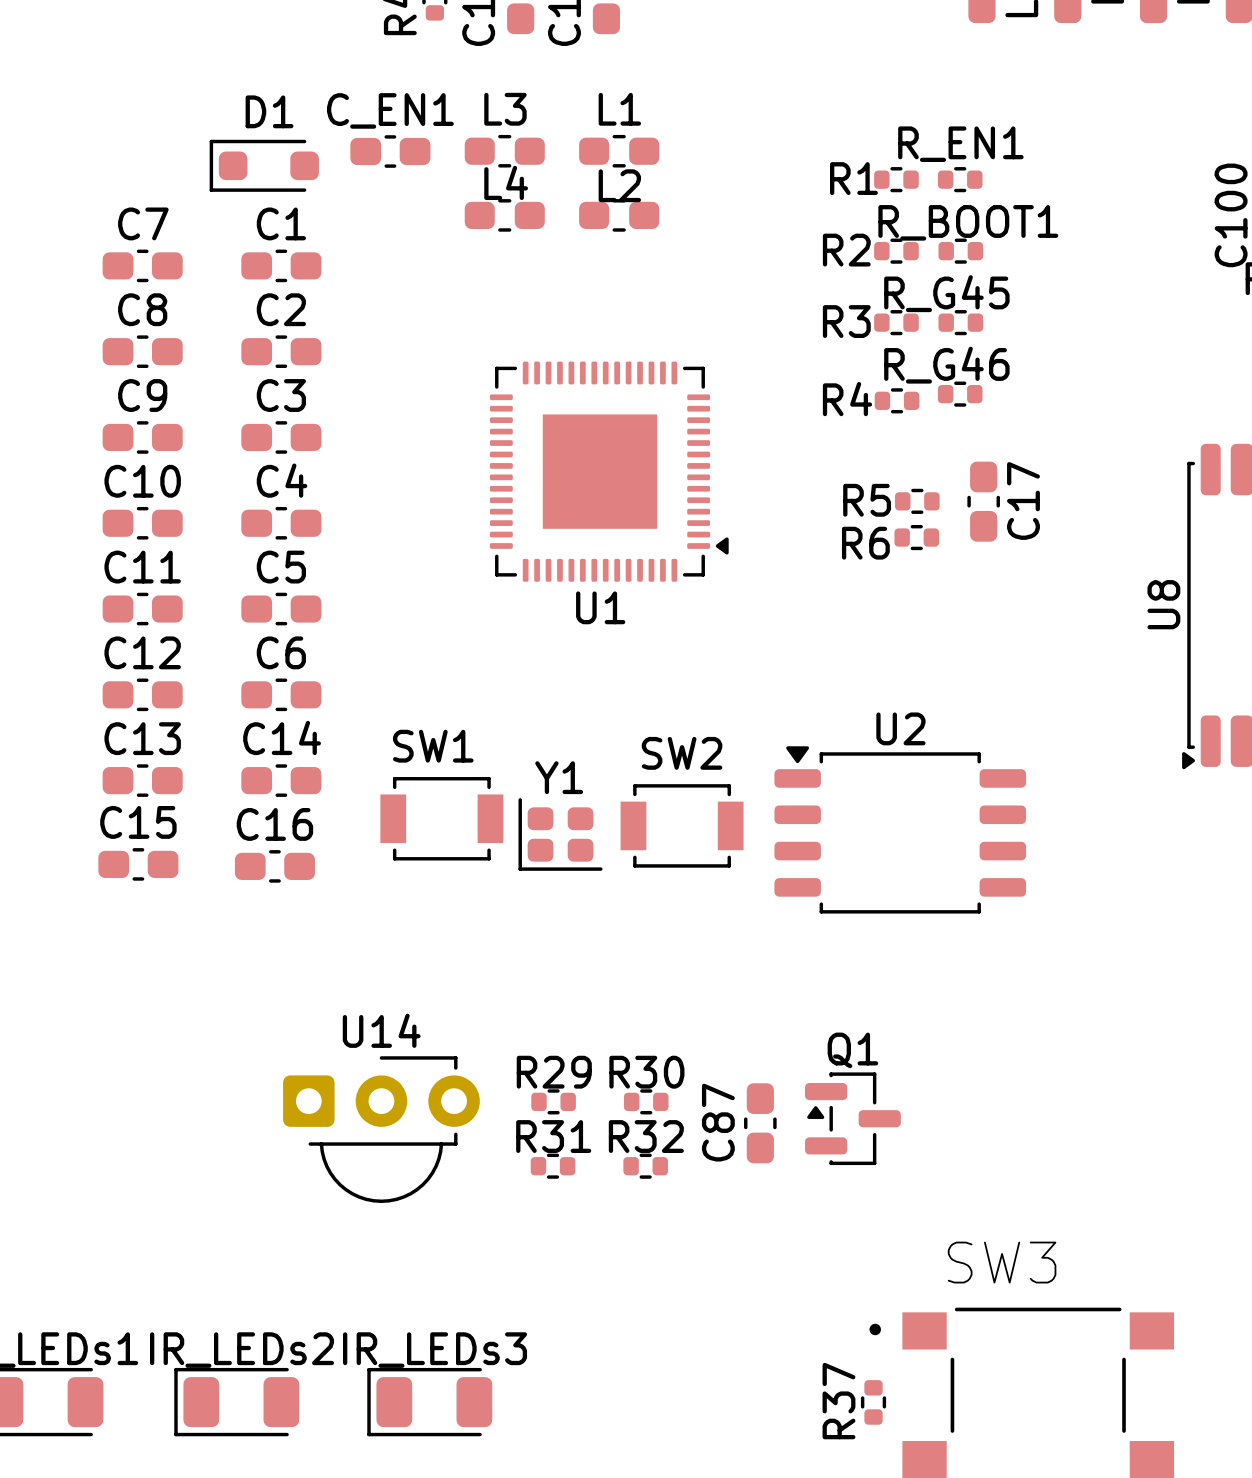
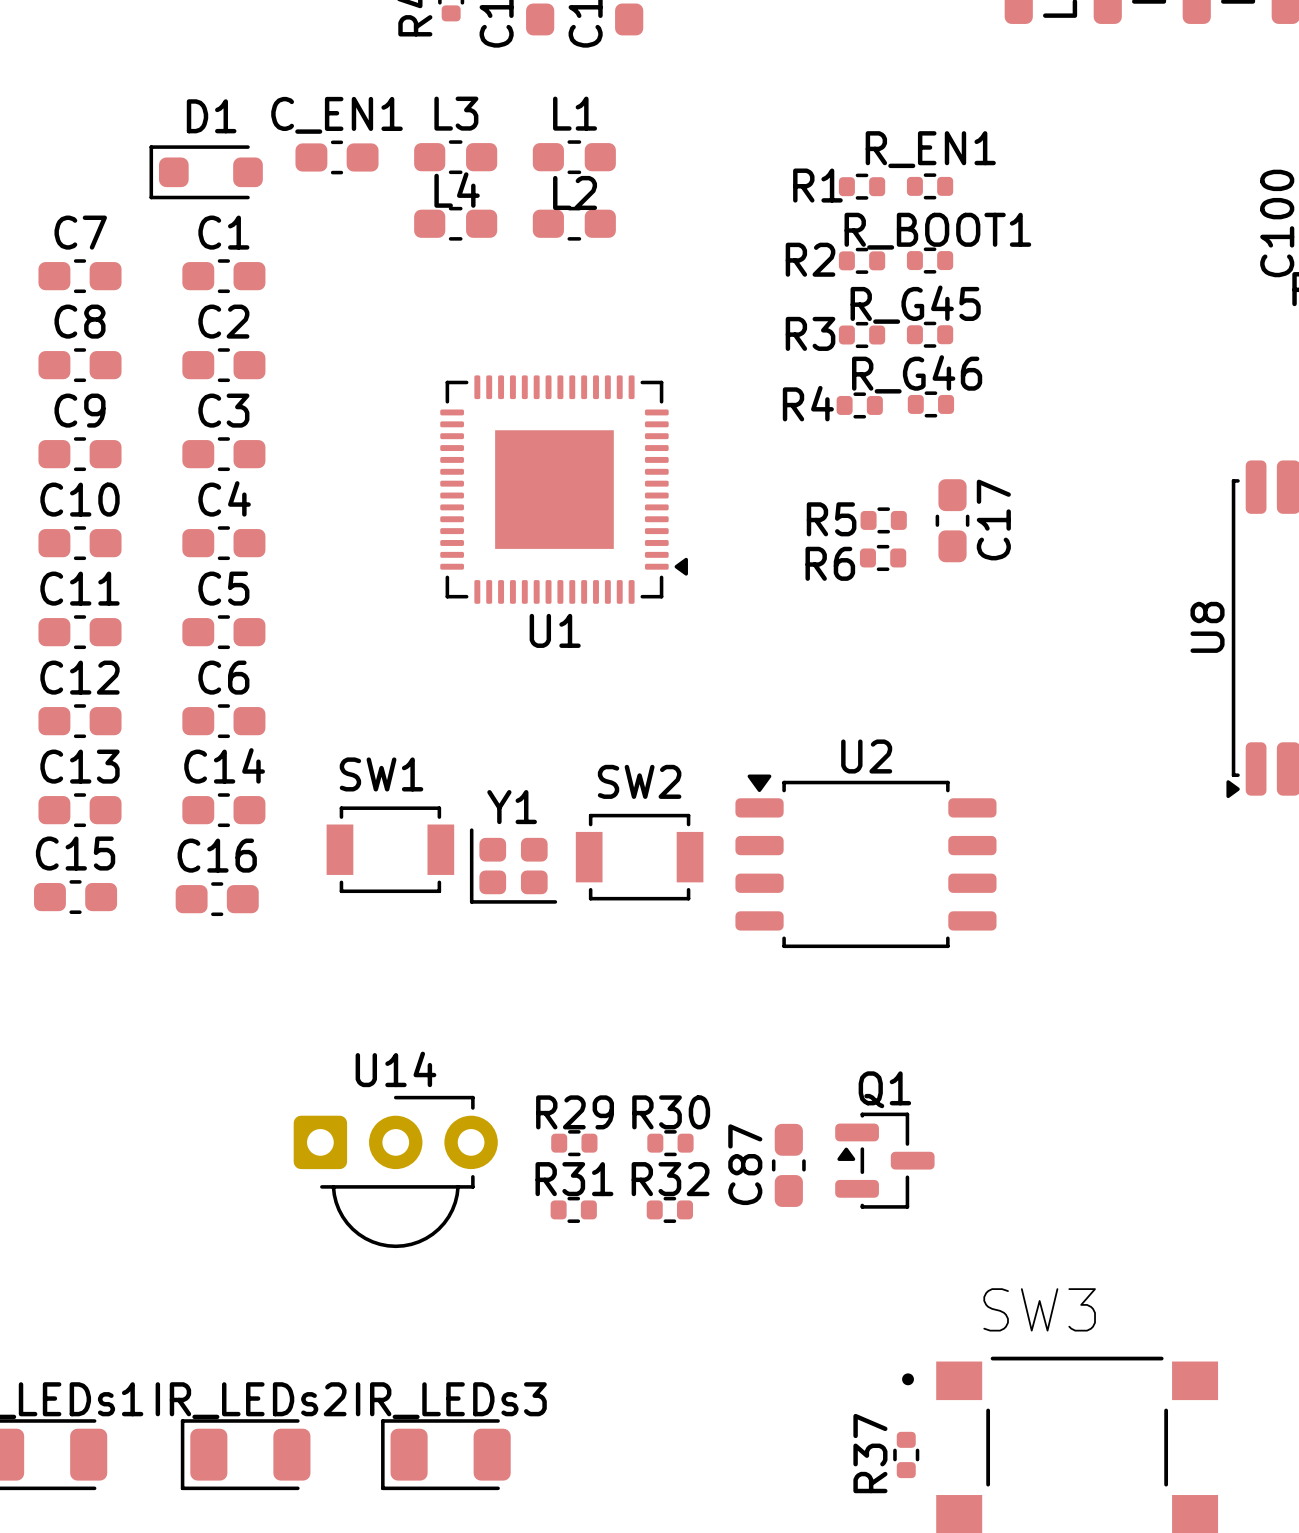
C_EN1 position: (390, 151) -> (337, 157)
L3 position: (504, 151) -> (455, 157)
L1 position: (619, 151) -> (574, 157)
D1 position: (264, 165) -> (206, 172)
R1 name: R1 (853, 178) -> R_EN1 (930, 149)
R1: none -> (862, 186)
R_EN1: (960, 179) -> none
L4 position: (504, 215) -> (455, 223)
L2 position: (619, 215) -> (574, 223)
R2 name: R2 (846, 250) -> R_BOOT1 (937, 231)
R2: none -> (862, 260)
R_BOOT1: (960, 251) -> none
C7 position: (142, 265) -> (80, 276)
C1 position: (281, 265) -> (223, 276)
R3 name: R3 (846, 321) -> R_G45 (915, 304)
R3: none -> (862, 335)
R_G45: (960, 322) -> none
C8 position: (142, 351) -> (80, 365)
C2 position: (281, 351) -> (223, 365)
R_G46 position: (960, 394) -> (930, 404)
R4 position: (897, 400) -> (859, 405)
C9 position: (142, 437) -> (80, 454)
C3 position: (281, 437) -> (223, 454)
U1 position: (609, 471) -> (564, 489)
R5 position: (917, 501) -> (883, 520)
C17 position: (983, 501) -> (952, 520)
C10 position: (142, 523) -> (80, 543)
C4 position: (281, 523) -> (223, 543)
R6 position: (916, 537) -> (883, 557)
C11 position: (142, 609) -> (80, 632)
C5 position: (281, 609) -> (223, 632)
C12 position: (142, 694) -> (80, 721)
C6 position: (281, 694) -> (223, 721)
C13 position: (142, 780) -> (80, 810)
C14 position: (281, 780) -> (223, 810)
SW1 position: (441, 818) -> (390, 849)
SW2 position: (682, 825) -> (639, 857)
U2 position: (900, 829) -> (865, 861)
Y1 position: (560, 834) -> (513, 866)
C15 position: (138, 864) -> (75, 897)
C16 position: (274, 866) -> (217, 899)

